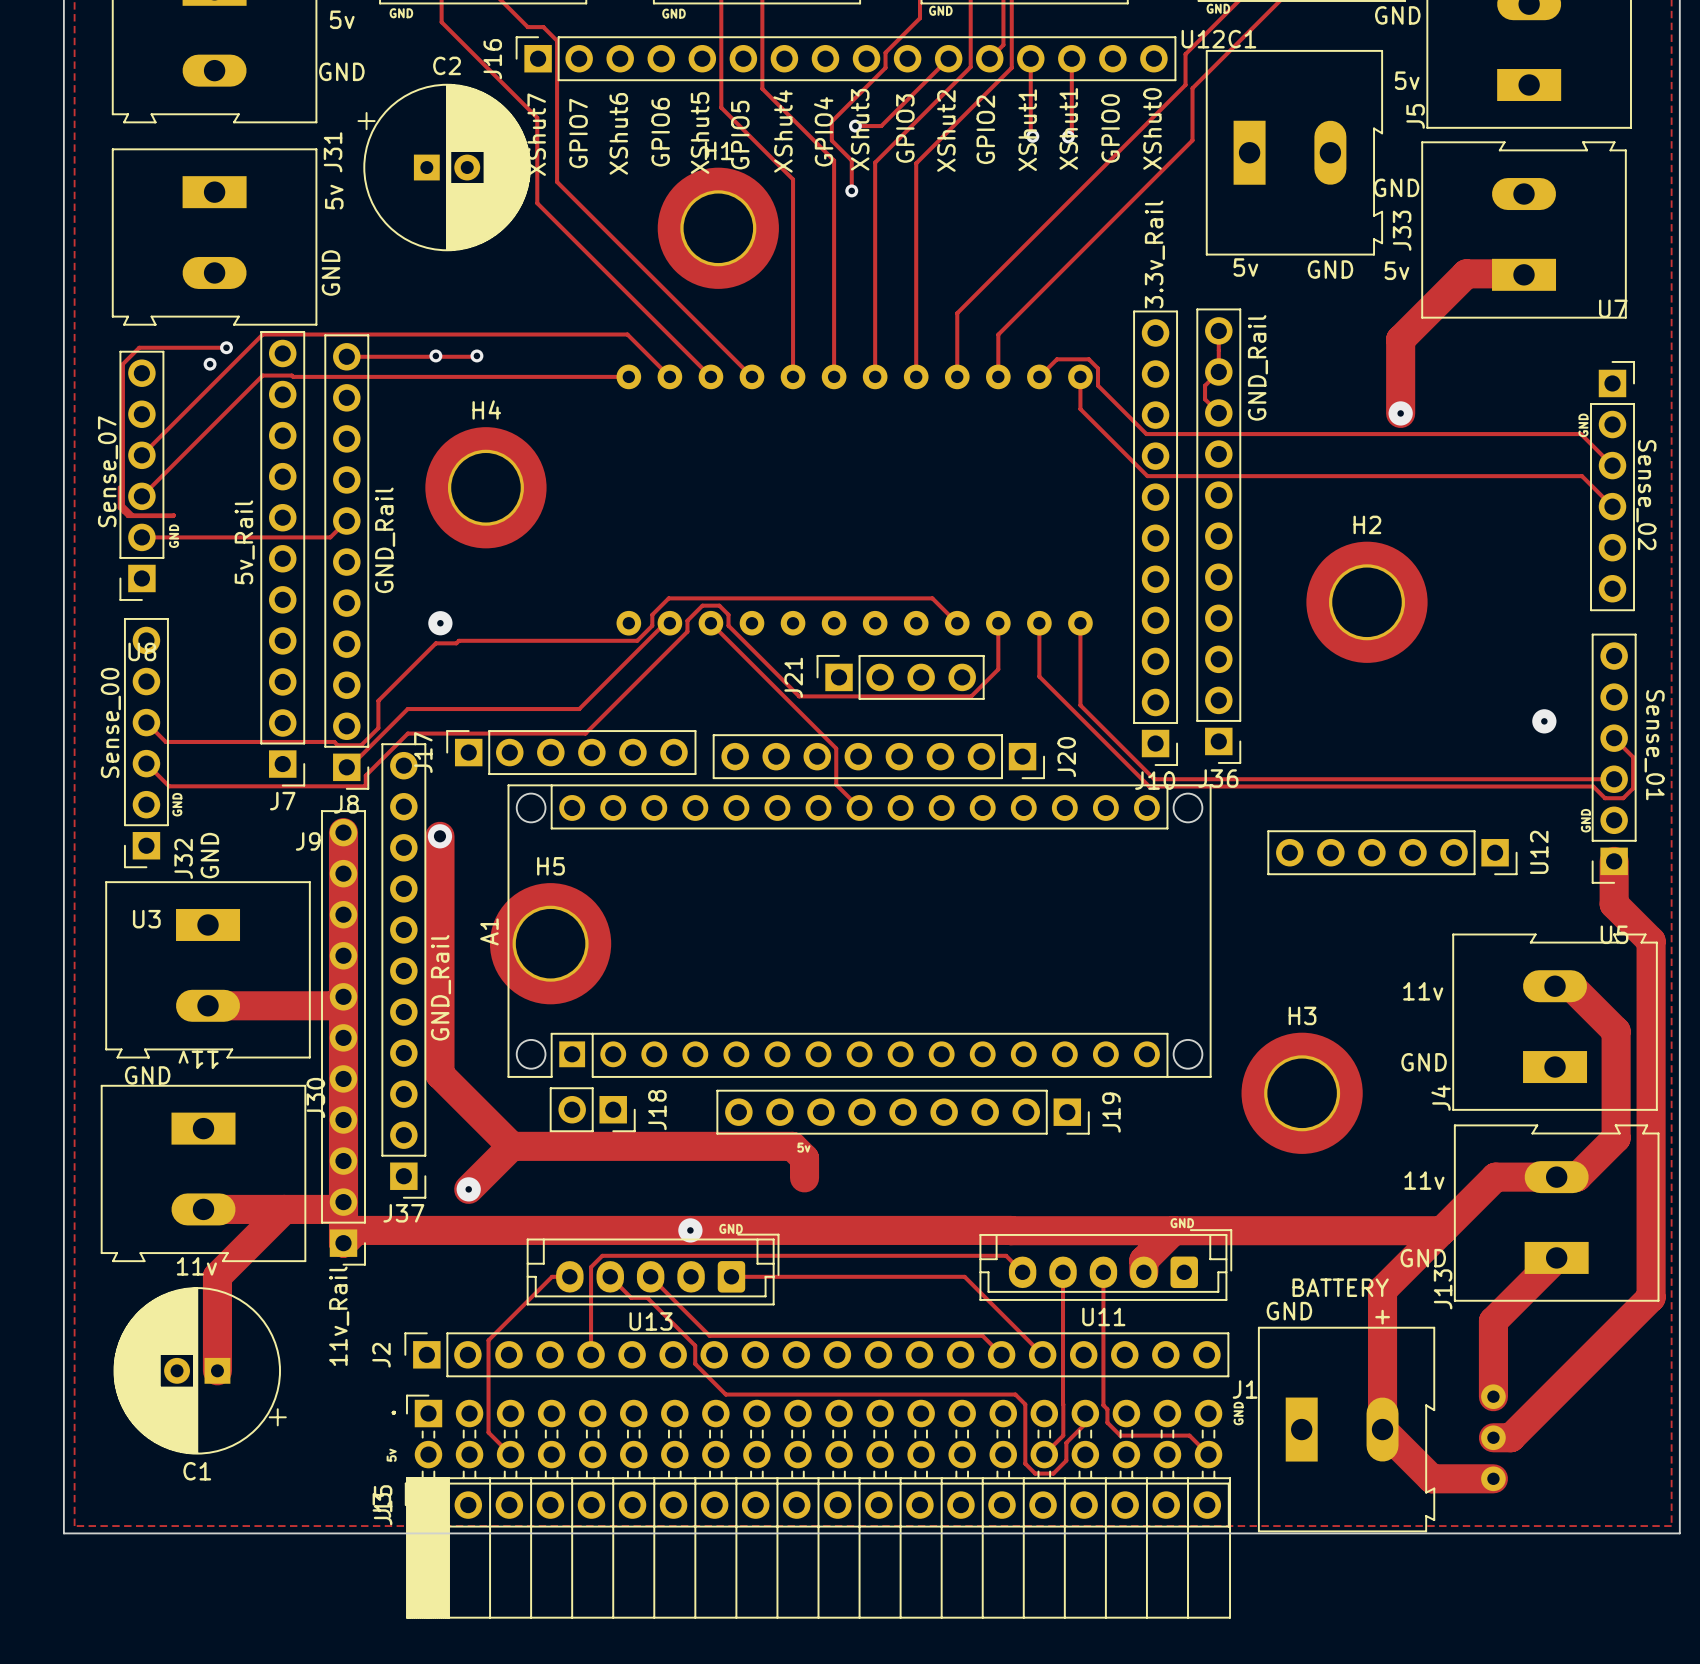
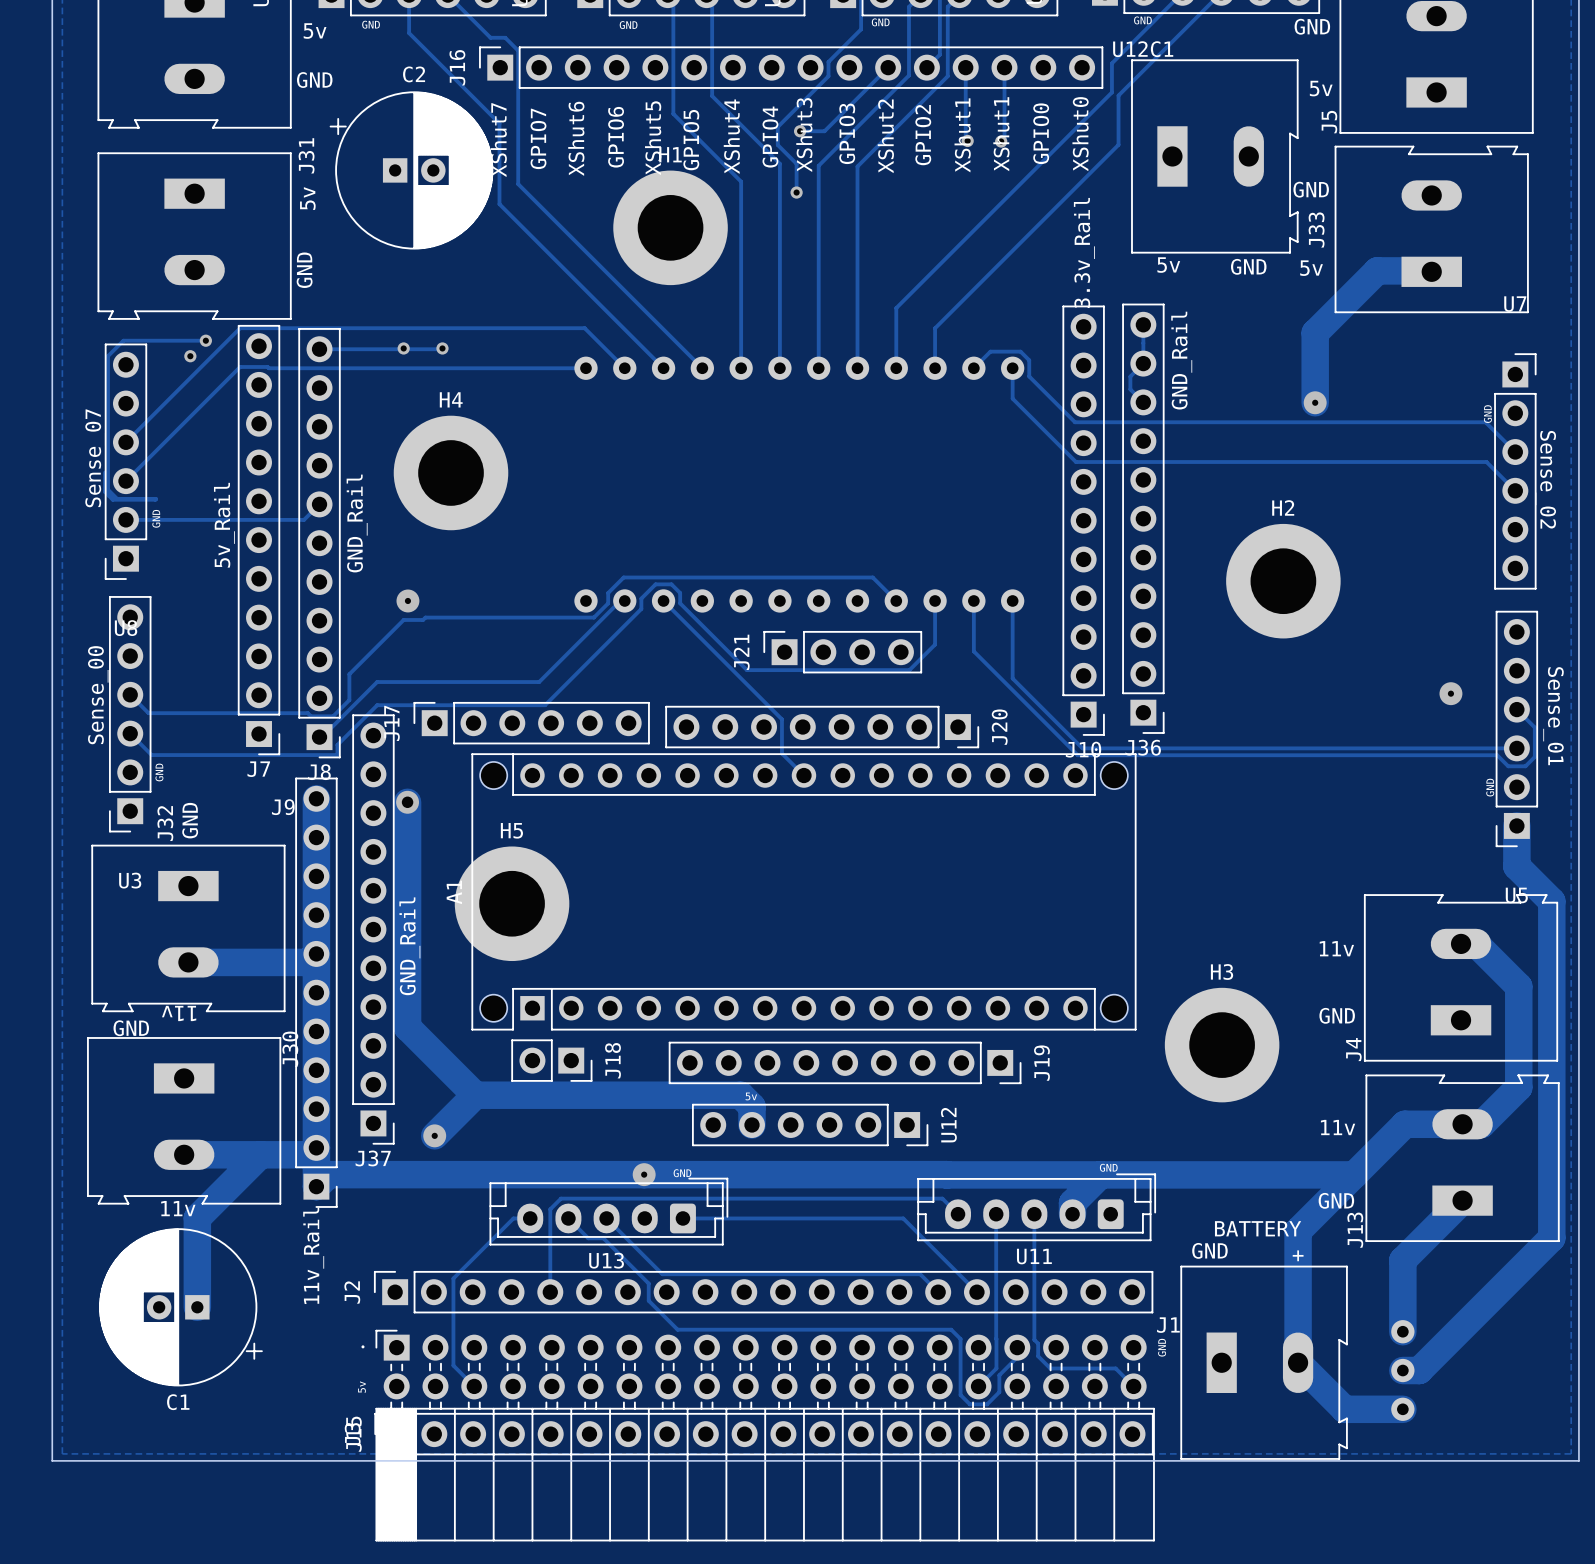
U12 position: (1392, 852) -> (810, 1124)

